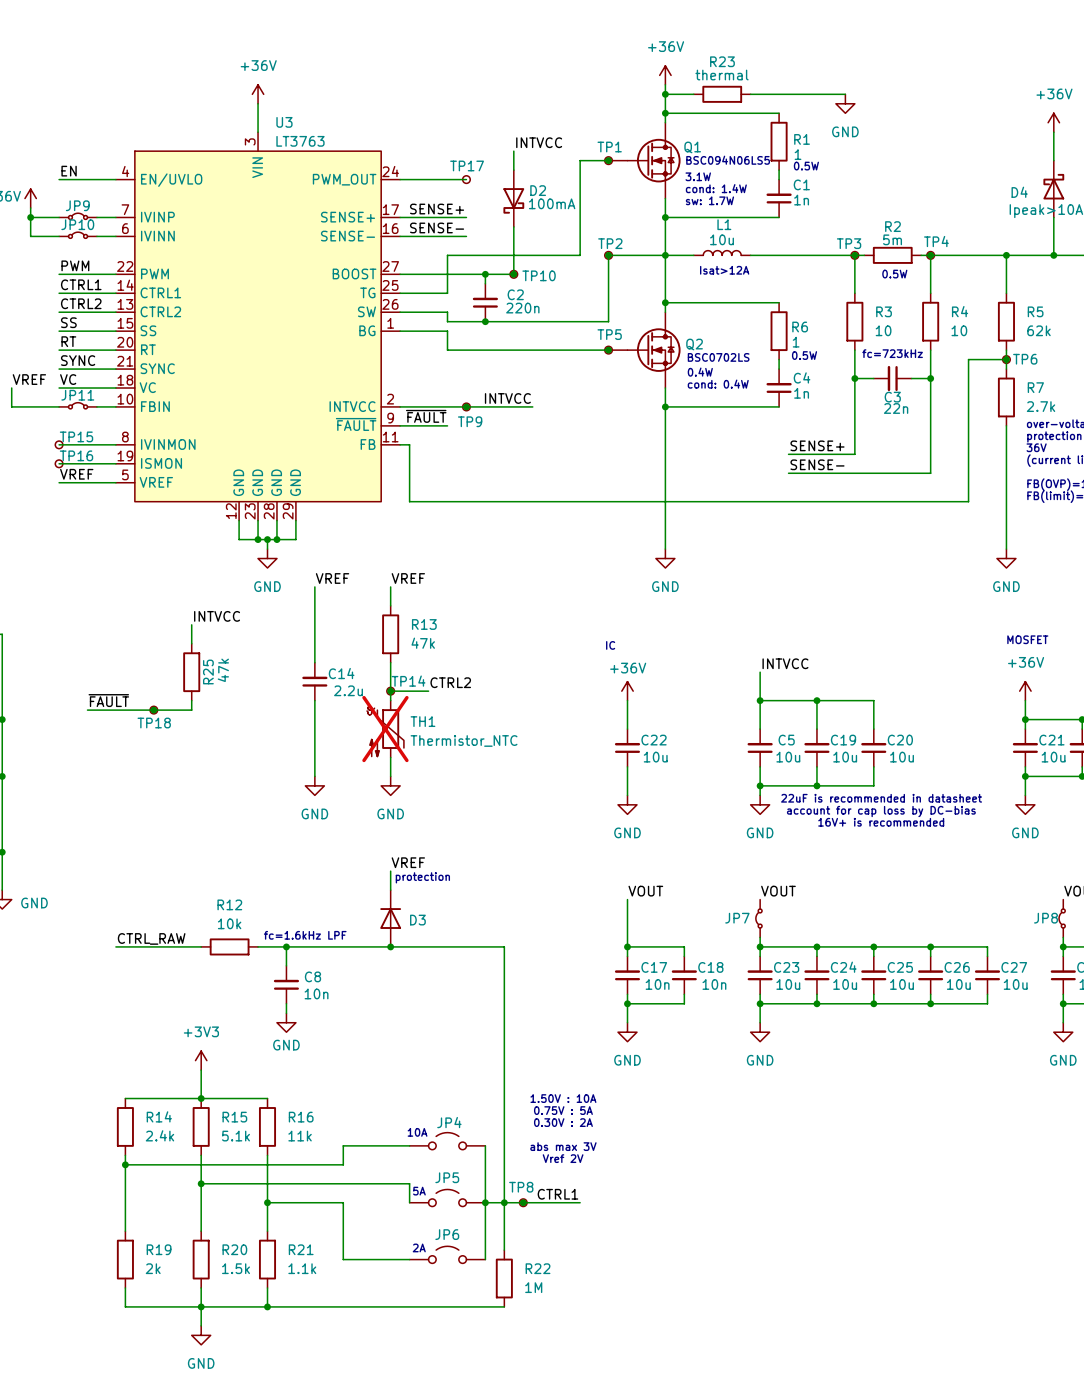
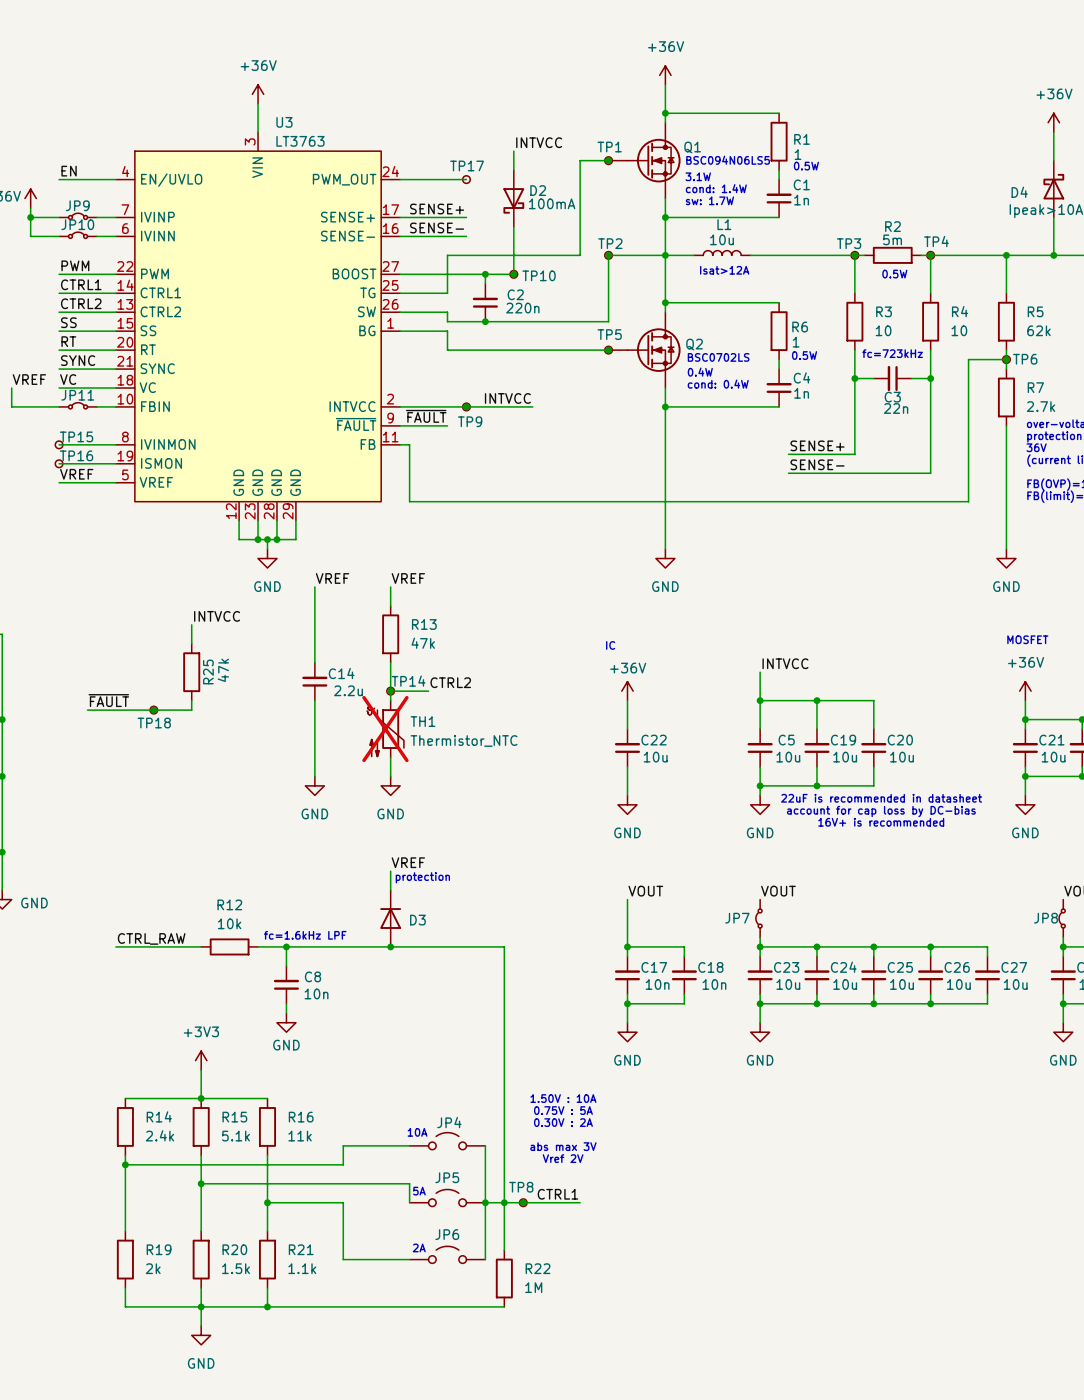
wire: (665, 94) (693, 94) -> none
junction: (665, 94) -> none
R23: thermal (722, 94) -> none
wire: (750, 94) (845, 94) -> none
power symbol: GND (845, 103) -> none

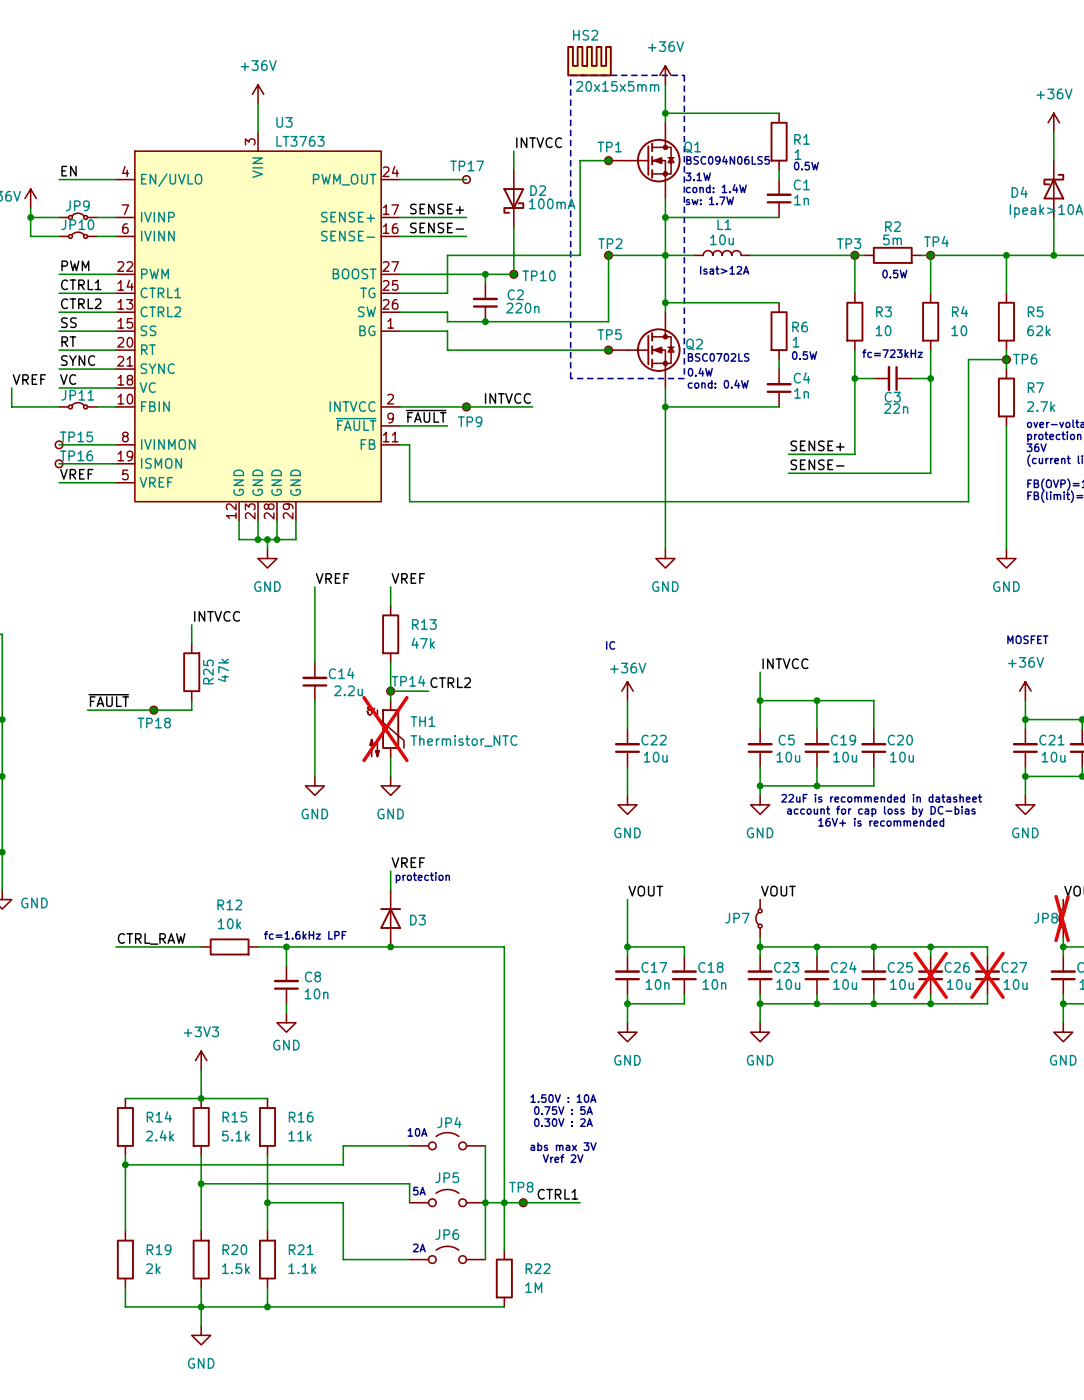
HS2: none -> 20x15x5mm (589, 61)
line: none -> (570, 75) (684, 75) (684, 378) (570, 378) (570, 75)
JP8 do-not-place cross: none -> (1062, 918)
C26 do-not-place cross: none -> (930, 975)
C27 do-not-place cross: none -> (987, 975)

